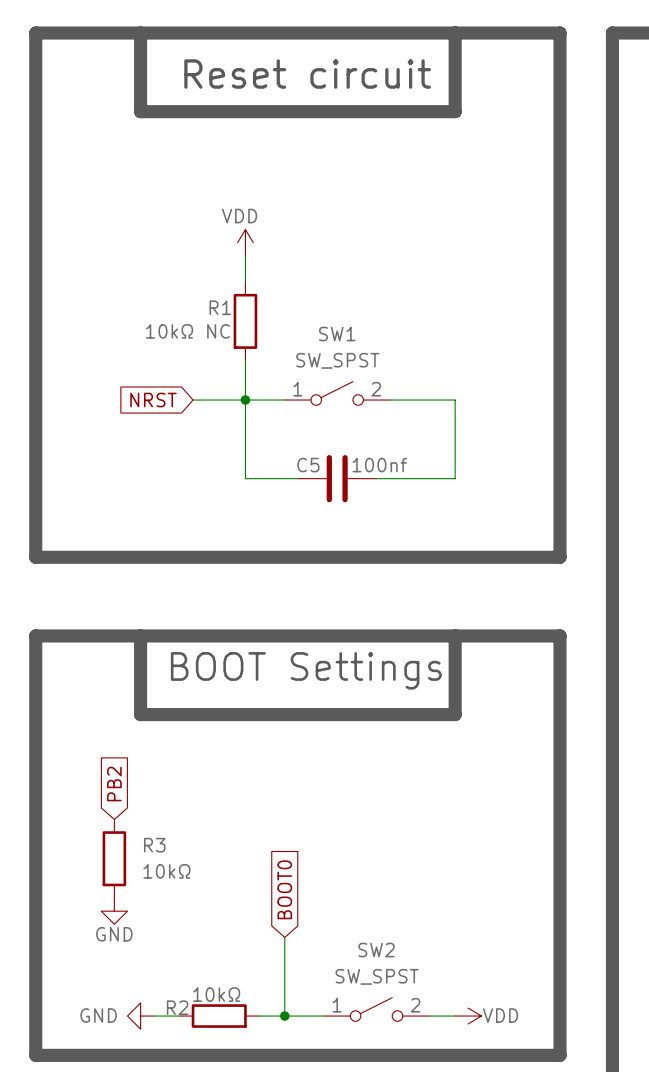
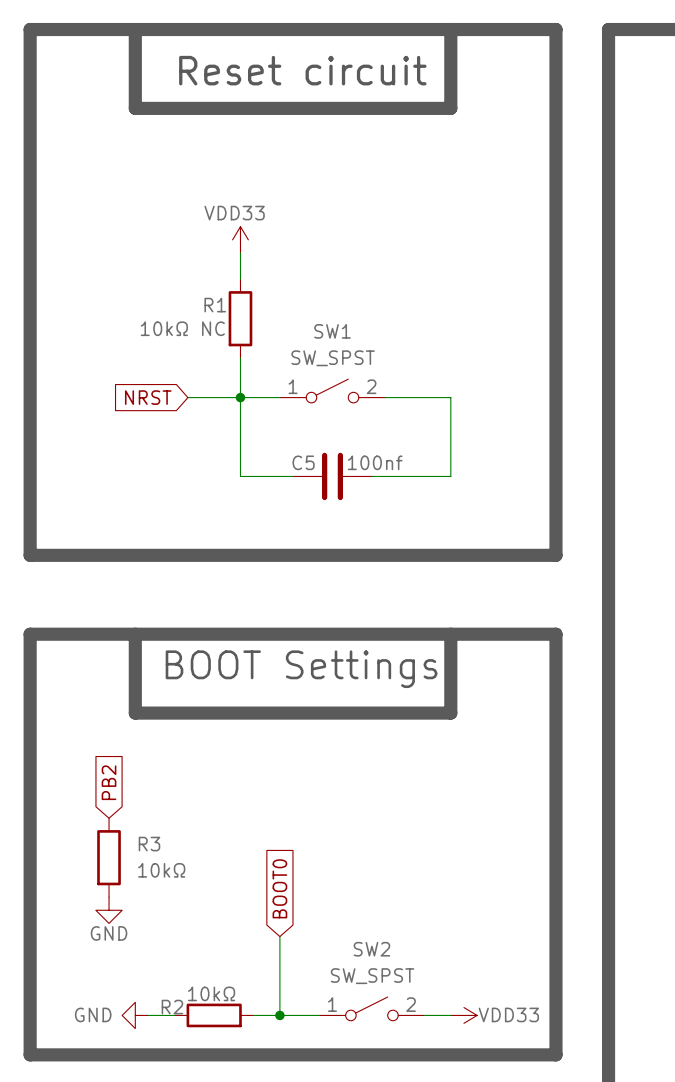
power symbol: VDD (245, 242) -> VDD33 (240, 239)
power symbol: VDD (468, 1016) -> VDD33 (463, 1015)

